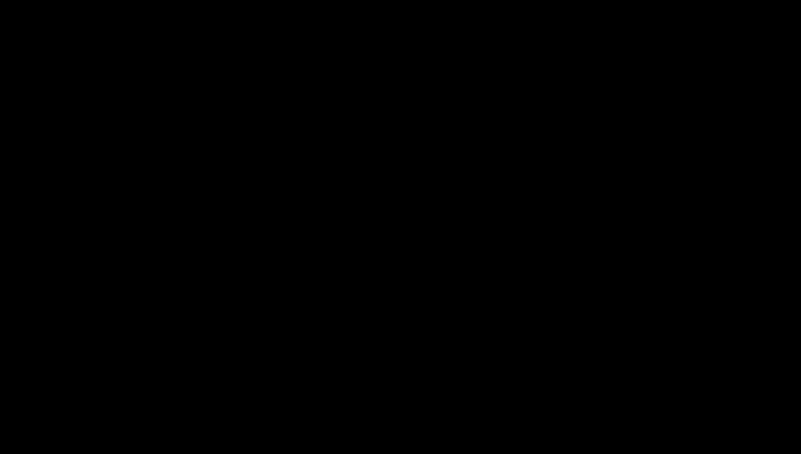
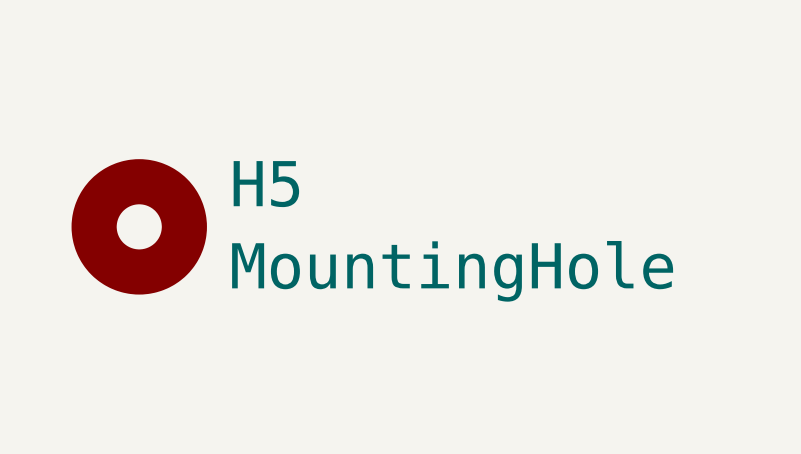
H5: none -> MountingHole (139, 226)

